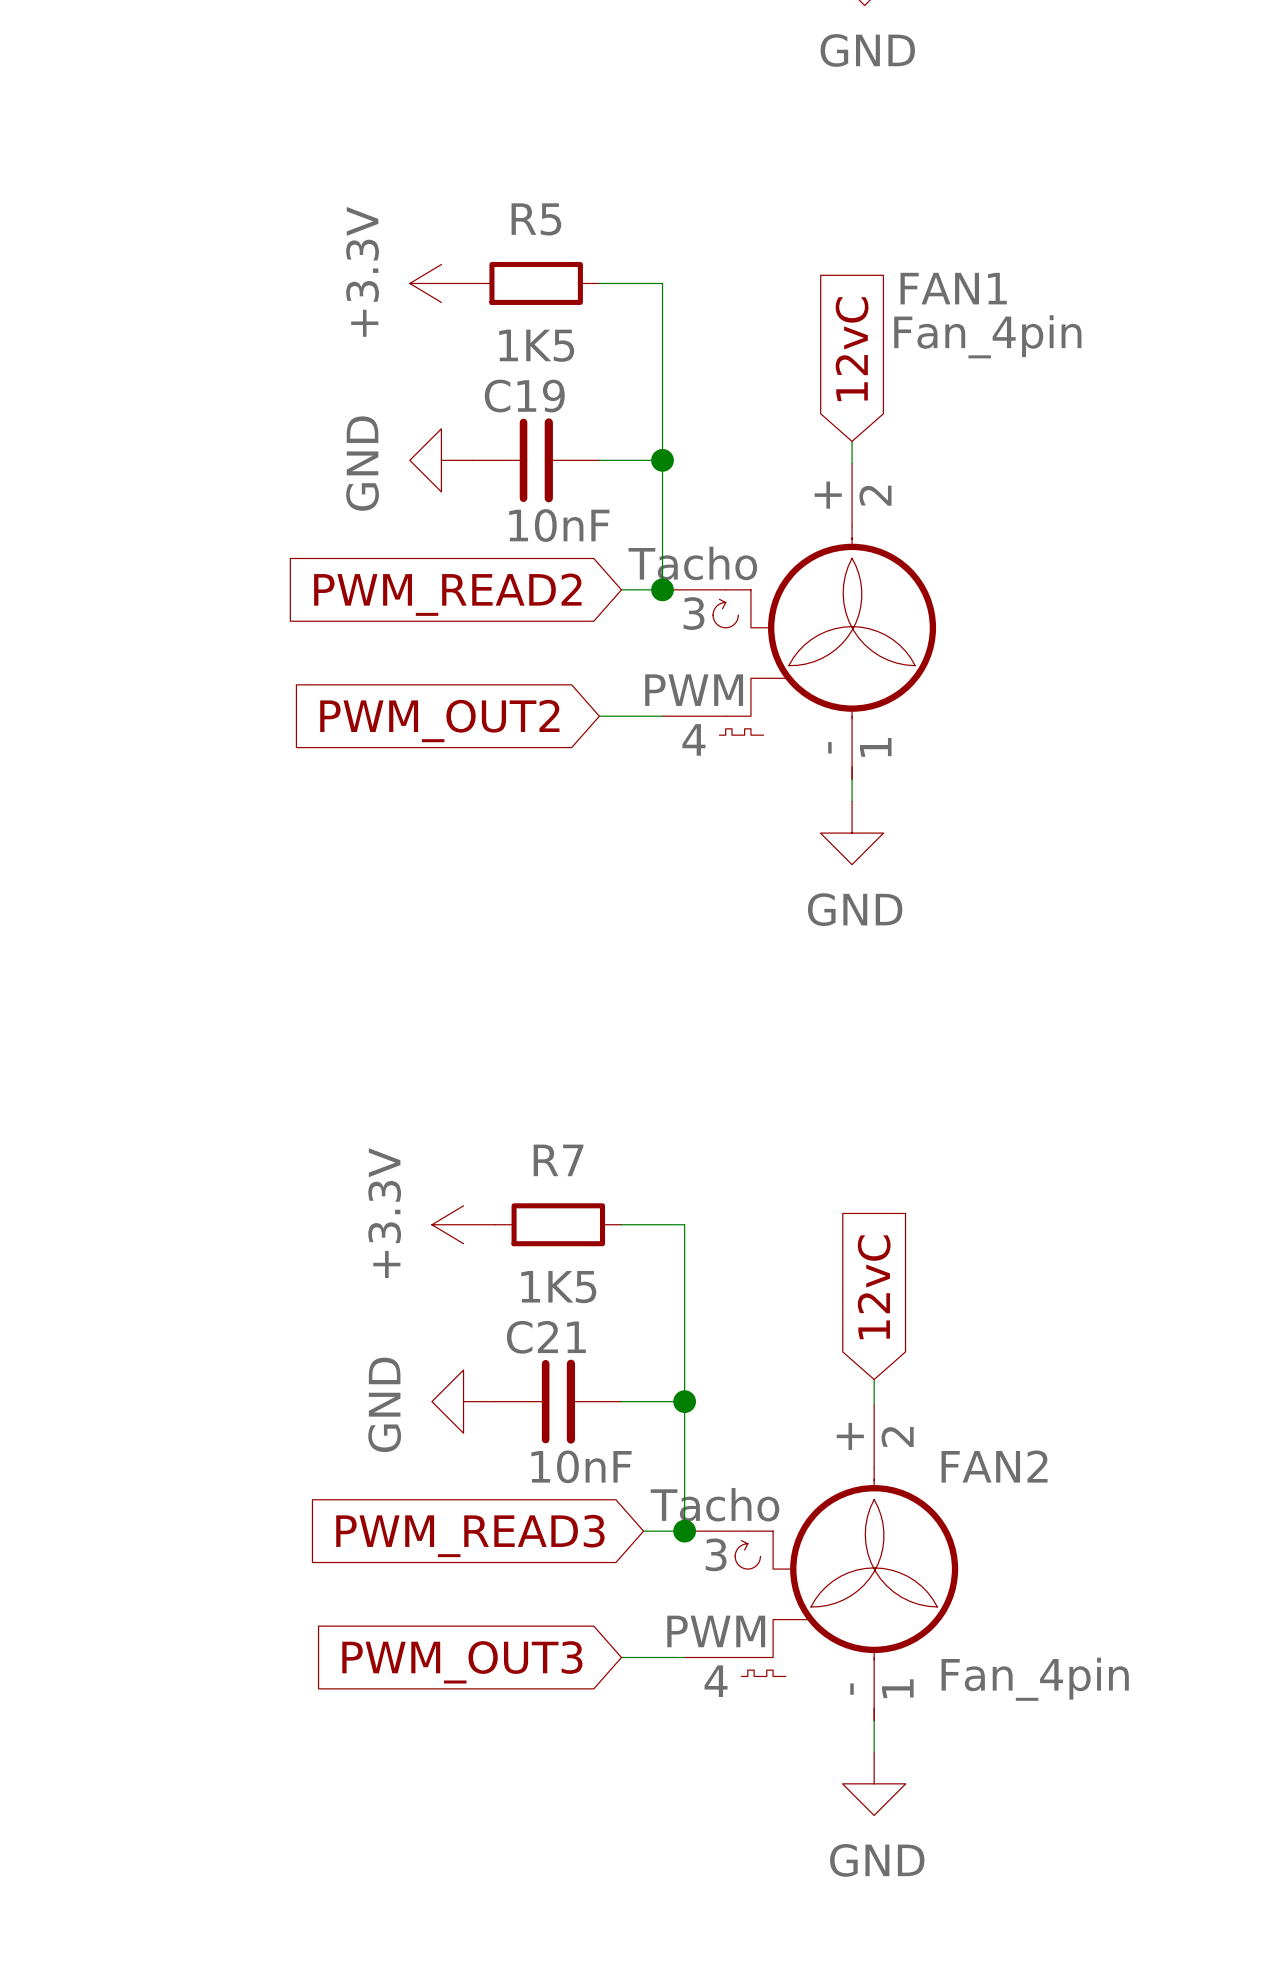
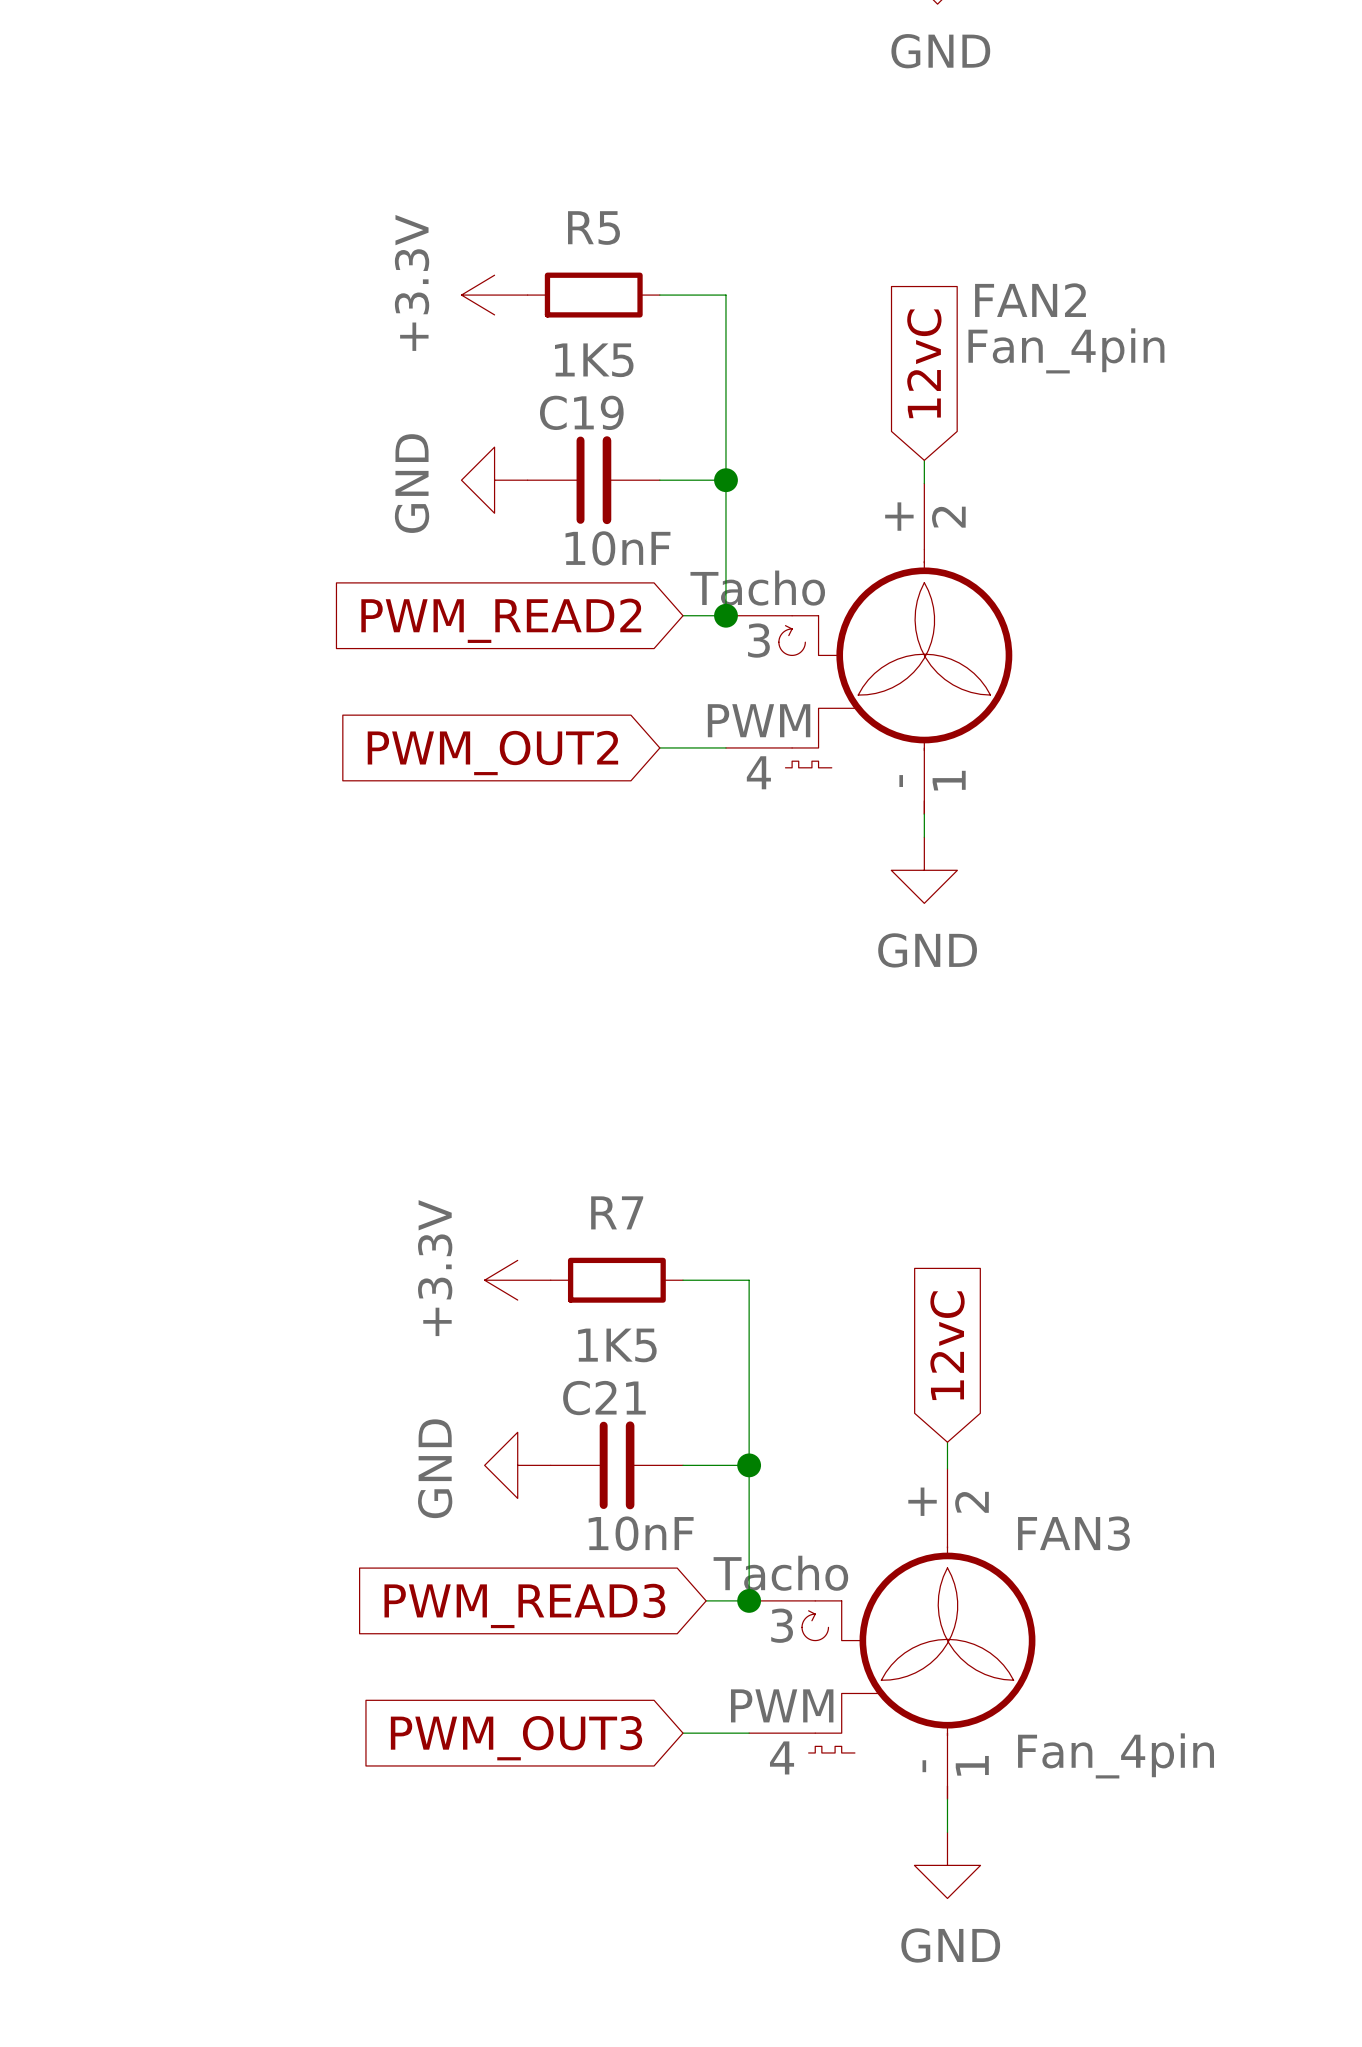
FAN1 name: FAN1 (953, 288) -> FAN2 (1030, 300)
FAN2 name: FAN2 (994, 1466) -> FAN3 (1073, 1533)

